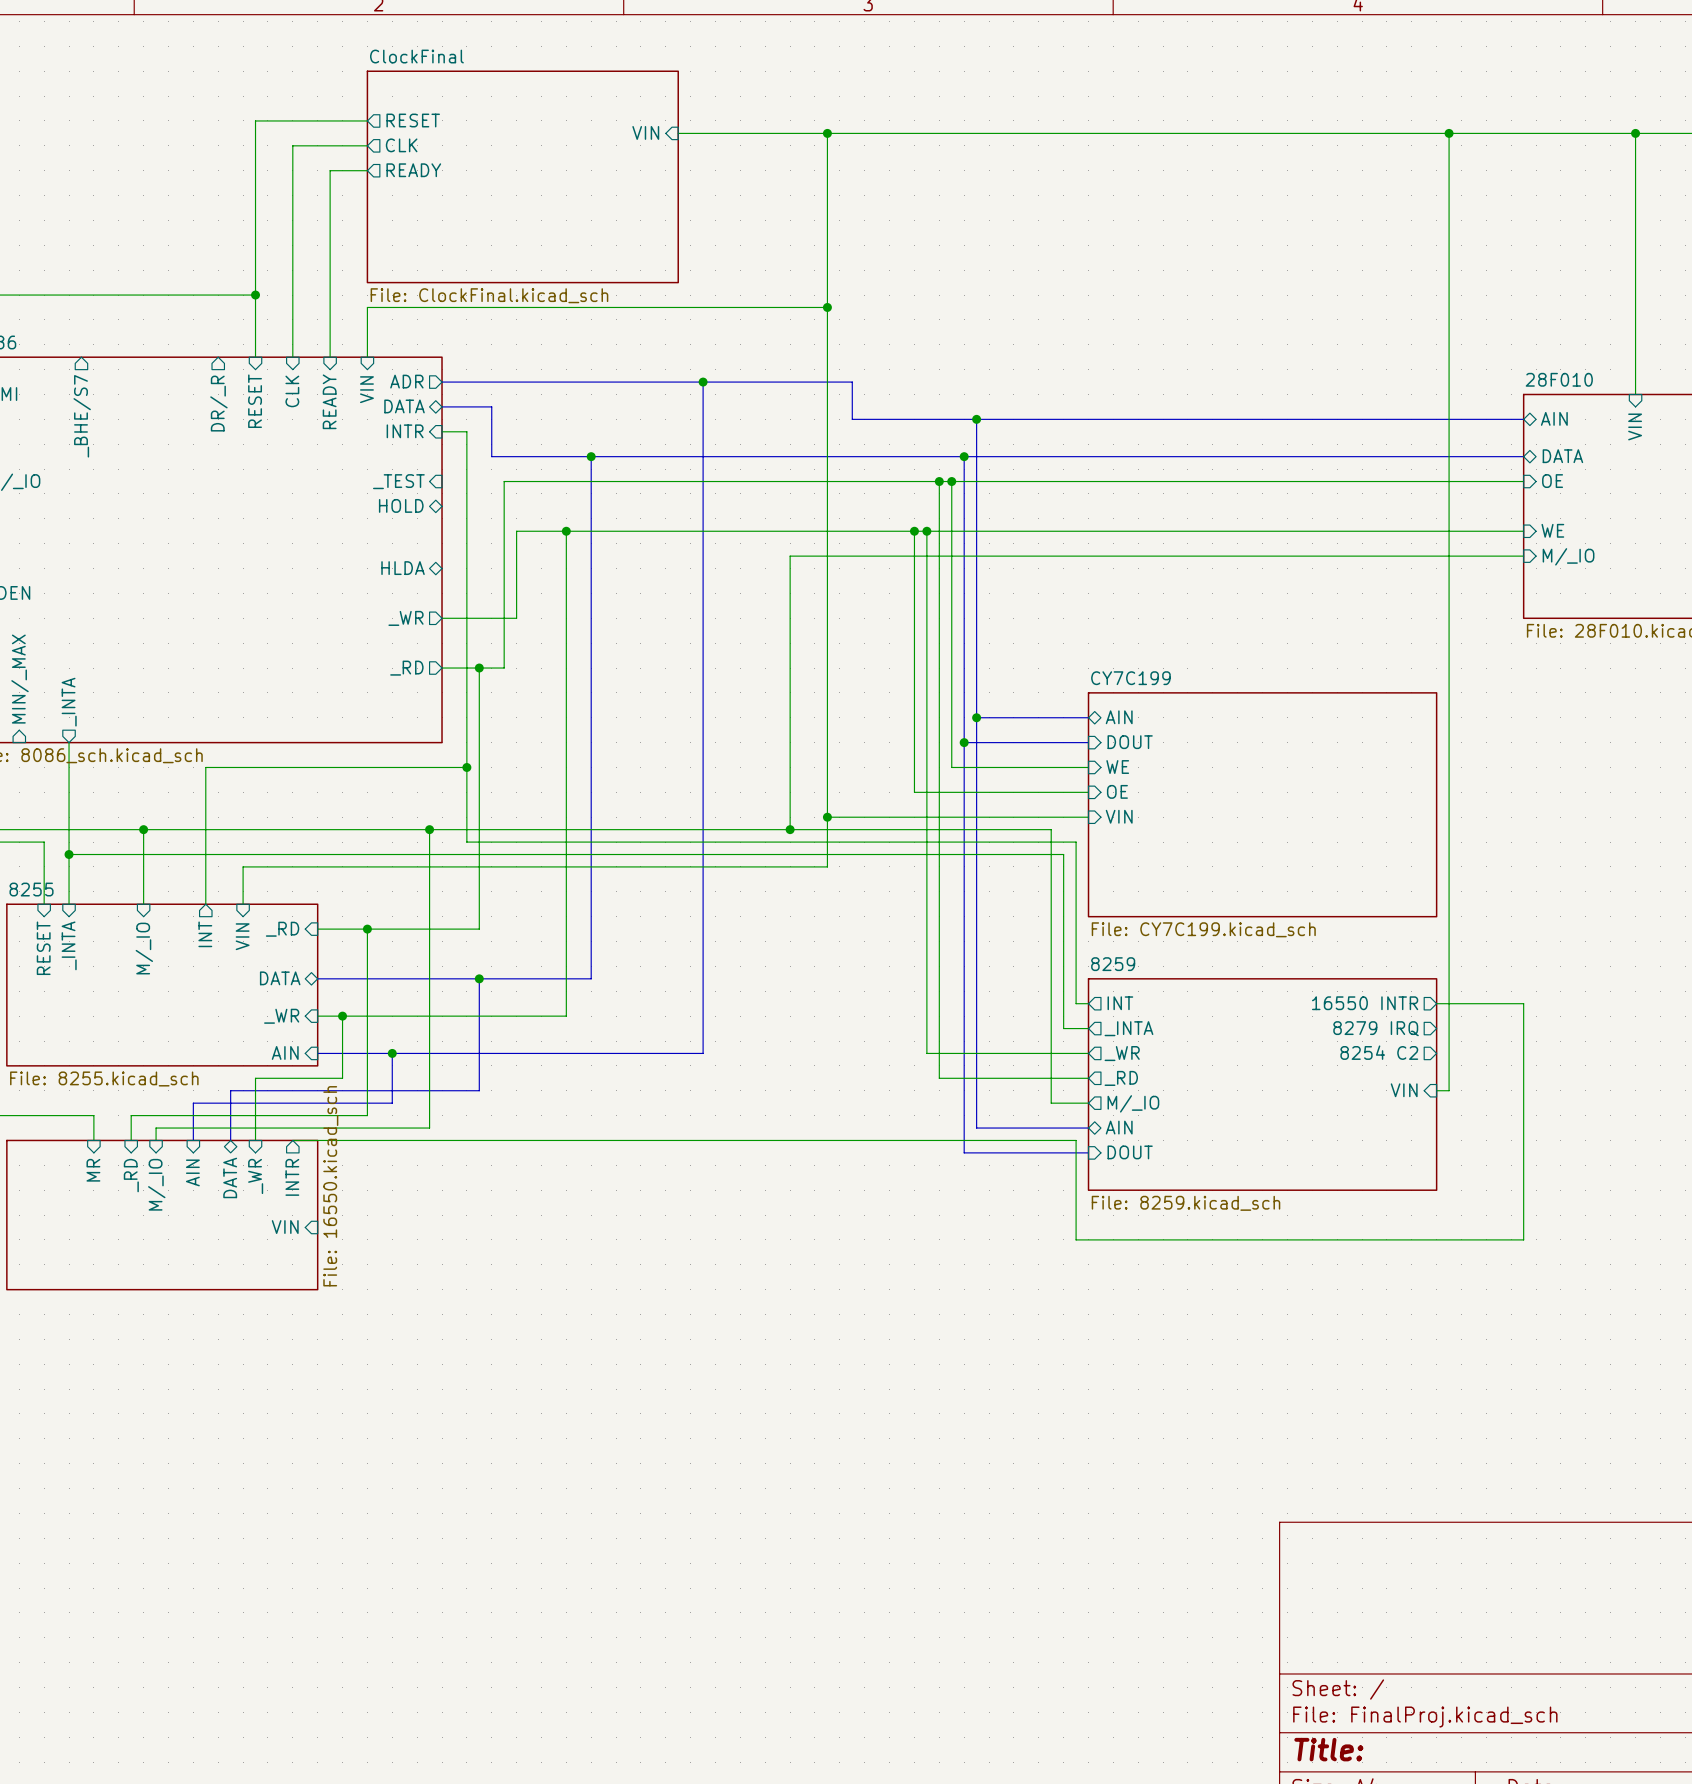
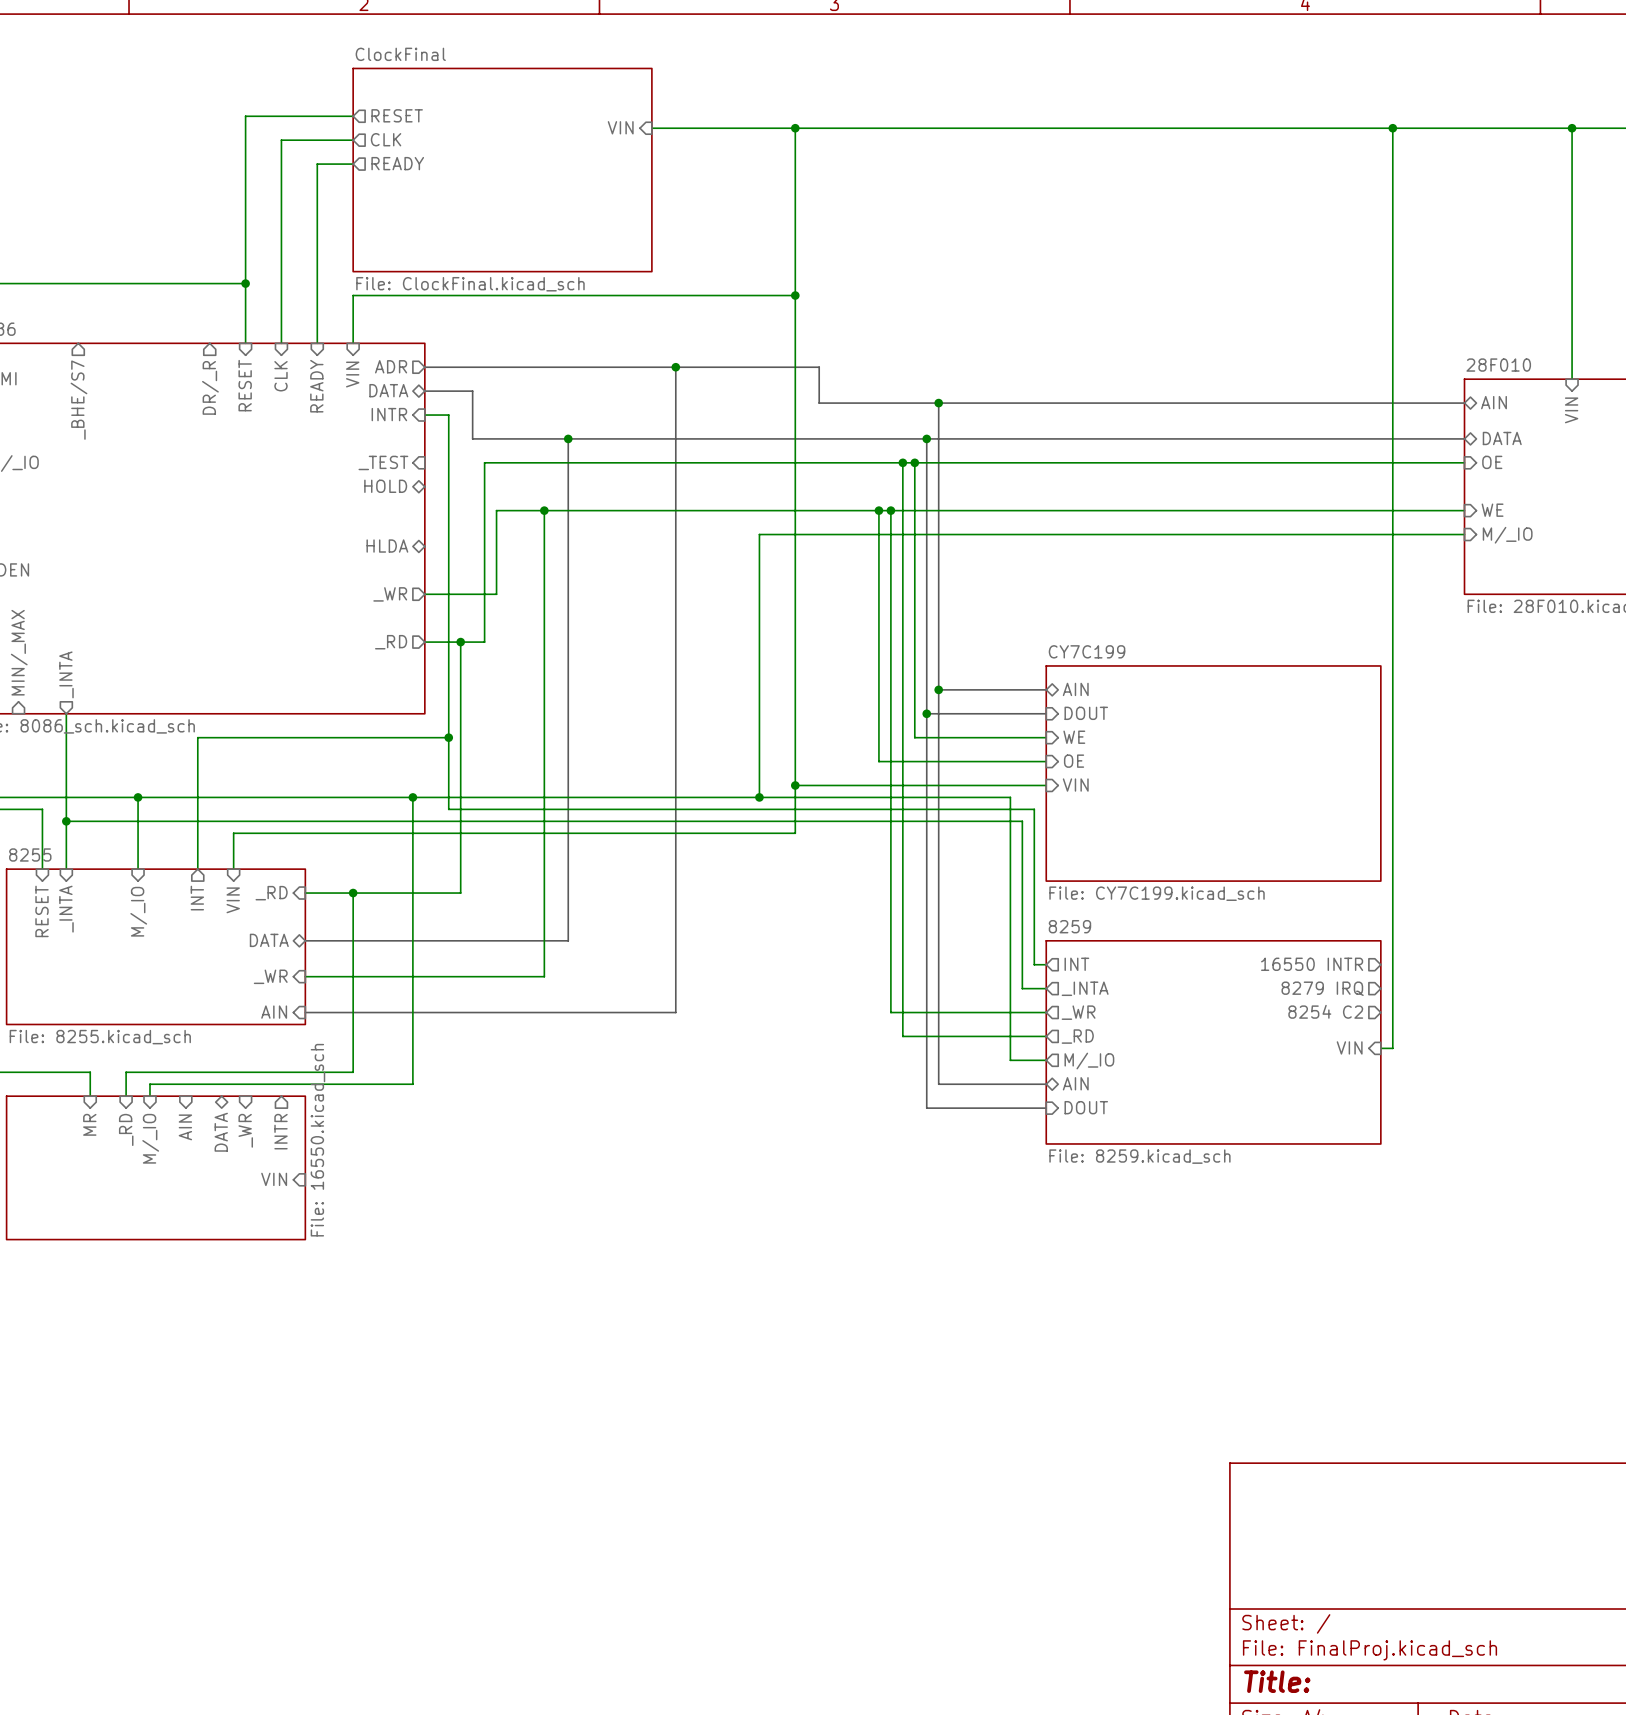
bus: (479, 978) (479, 1090) (230, 1090) (230, 1140) -> none
junction: (479, 978) -> none
wire: (1436, 1003) (1523, 1003) (1523, 1239) (1076, 1239) (1076, 1140) (292, 1140) -> none
wire: (342, 1016) (342, 1078) (255, 1078) (255, 1140) -> none
junction: (342, 1016) -> none
bus: (392, 1053) (392, 1103) (193, 1103) (193, 1140) -> none
junction: (392, 1053) -> none

